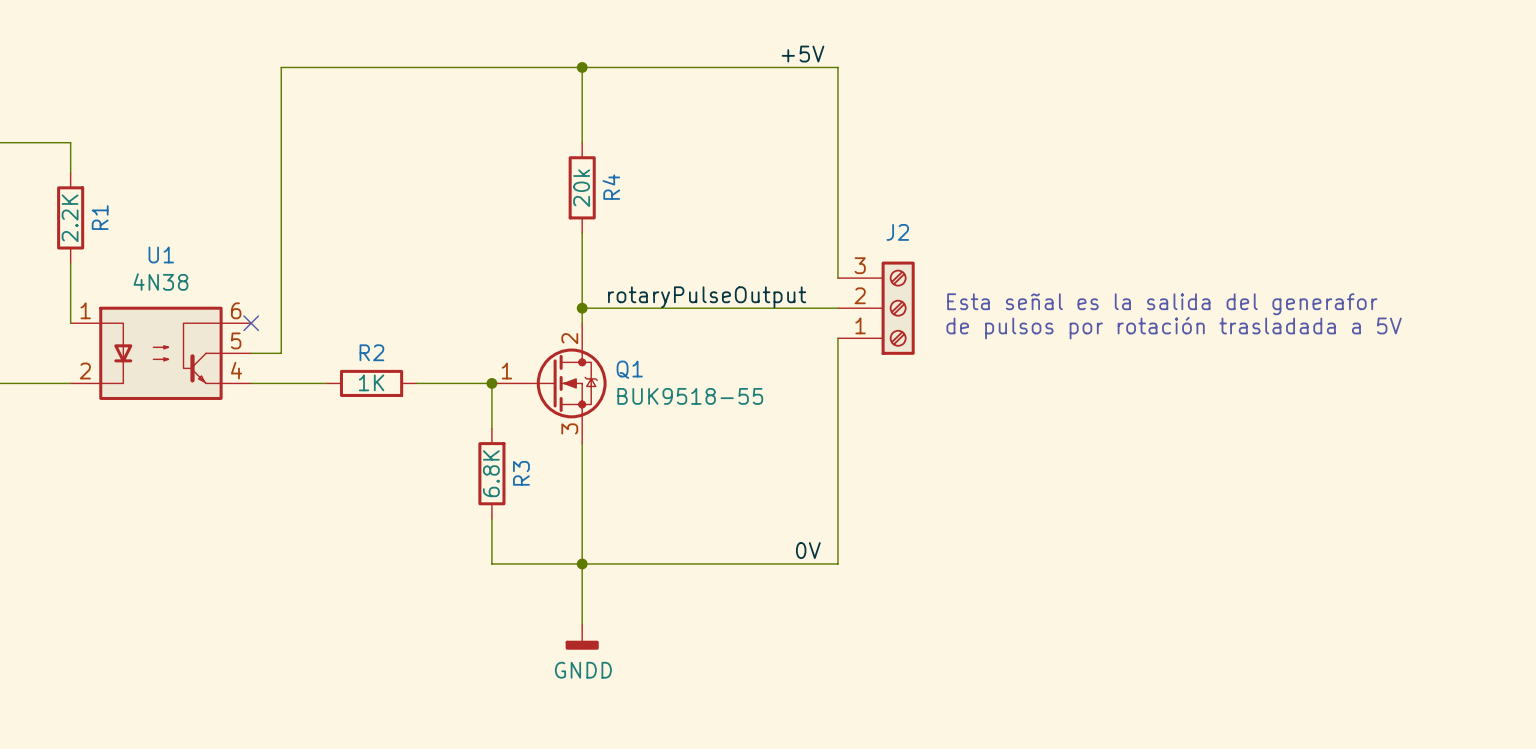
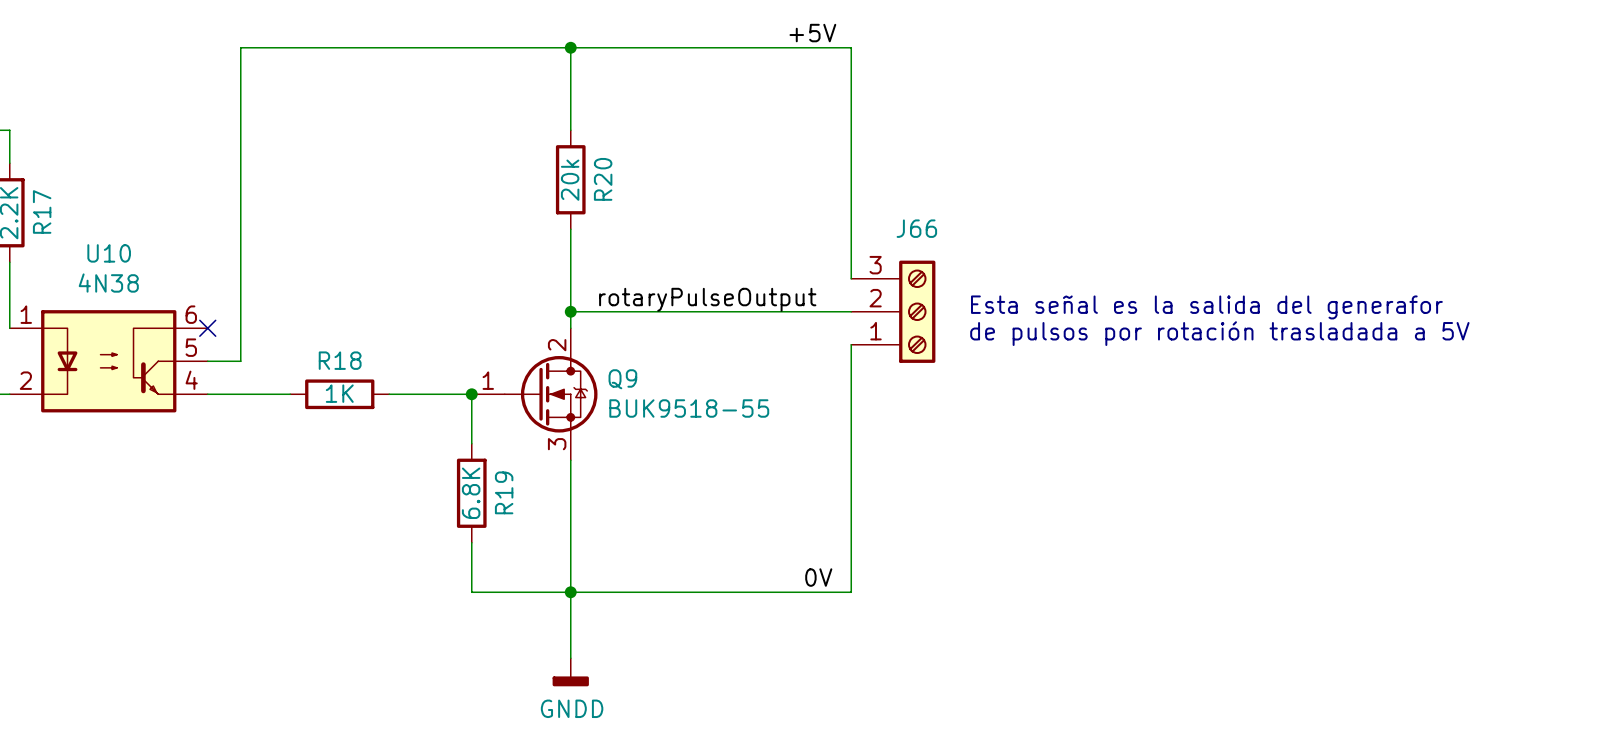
R4 name: R4 (611, 187) -> R20 (603, 179)
R1 name: R1 (100, 217) -> R17 (42, 211)
J2 name: J2 (897, 232) -> J66 (916, 228)
U1 name: U1 (161, 254) -> U10 (109, 253)
R2 name: R2 (371, 352) -> R18 (340, 360)
Q1 name: Q1 (629, 369) -> Q9 (622, 379)
R3 name: R3 (521, 473) -> R19 (504, 492)

